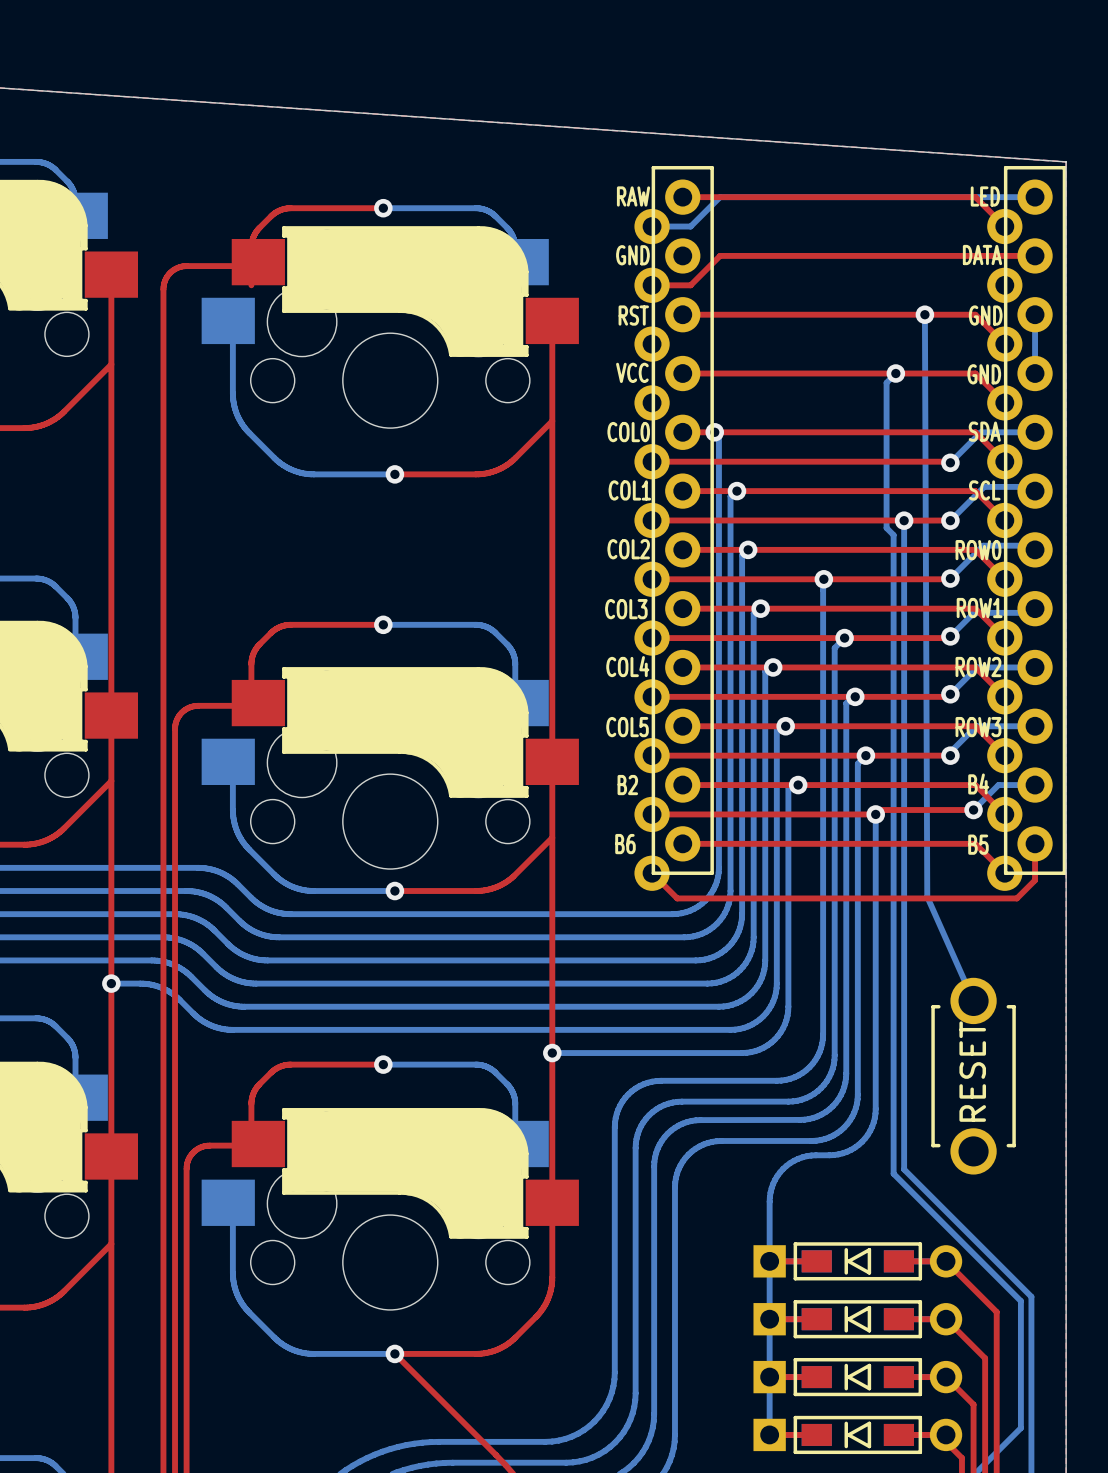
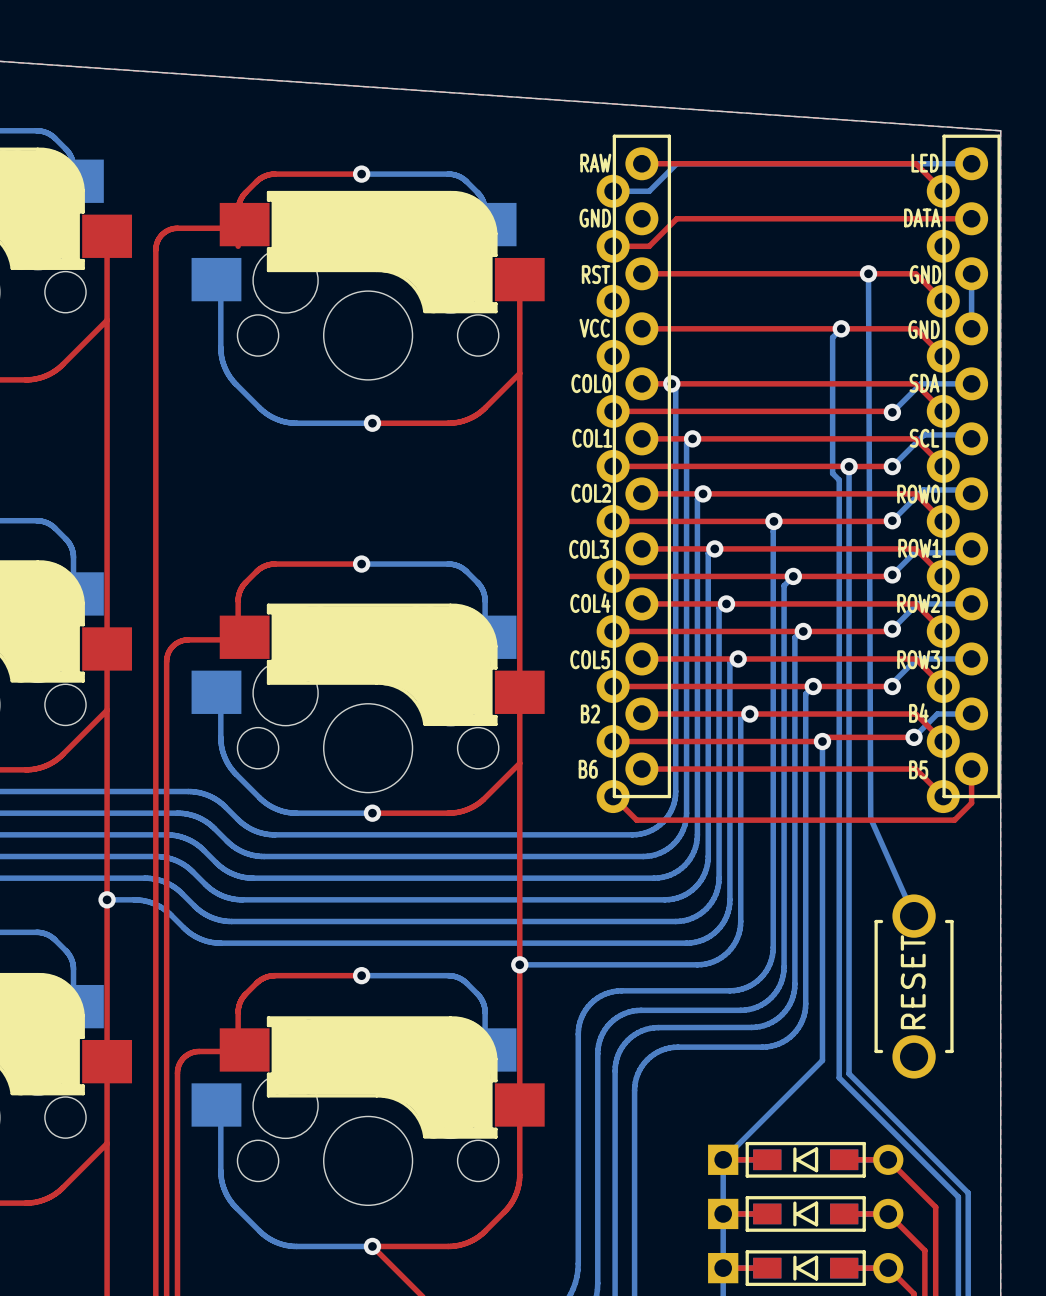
bottom track: (875, 1108) (870, 1130) (855, 1147) (838, 1154) (811, 1155) (798, 1158) (786, 1165) (777, 1175) (769, 1197) (769, 1261) -> (822, 1017) (822, 1060) (723, 1159)

